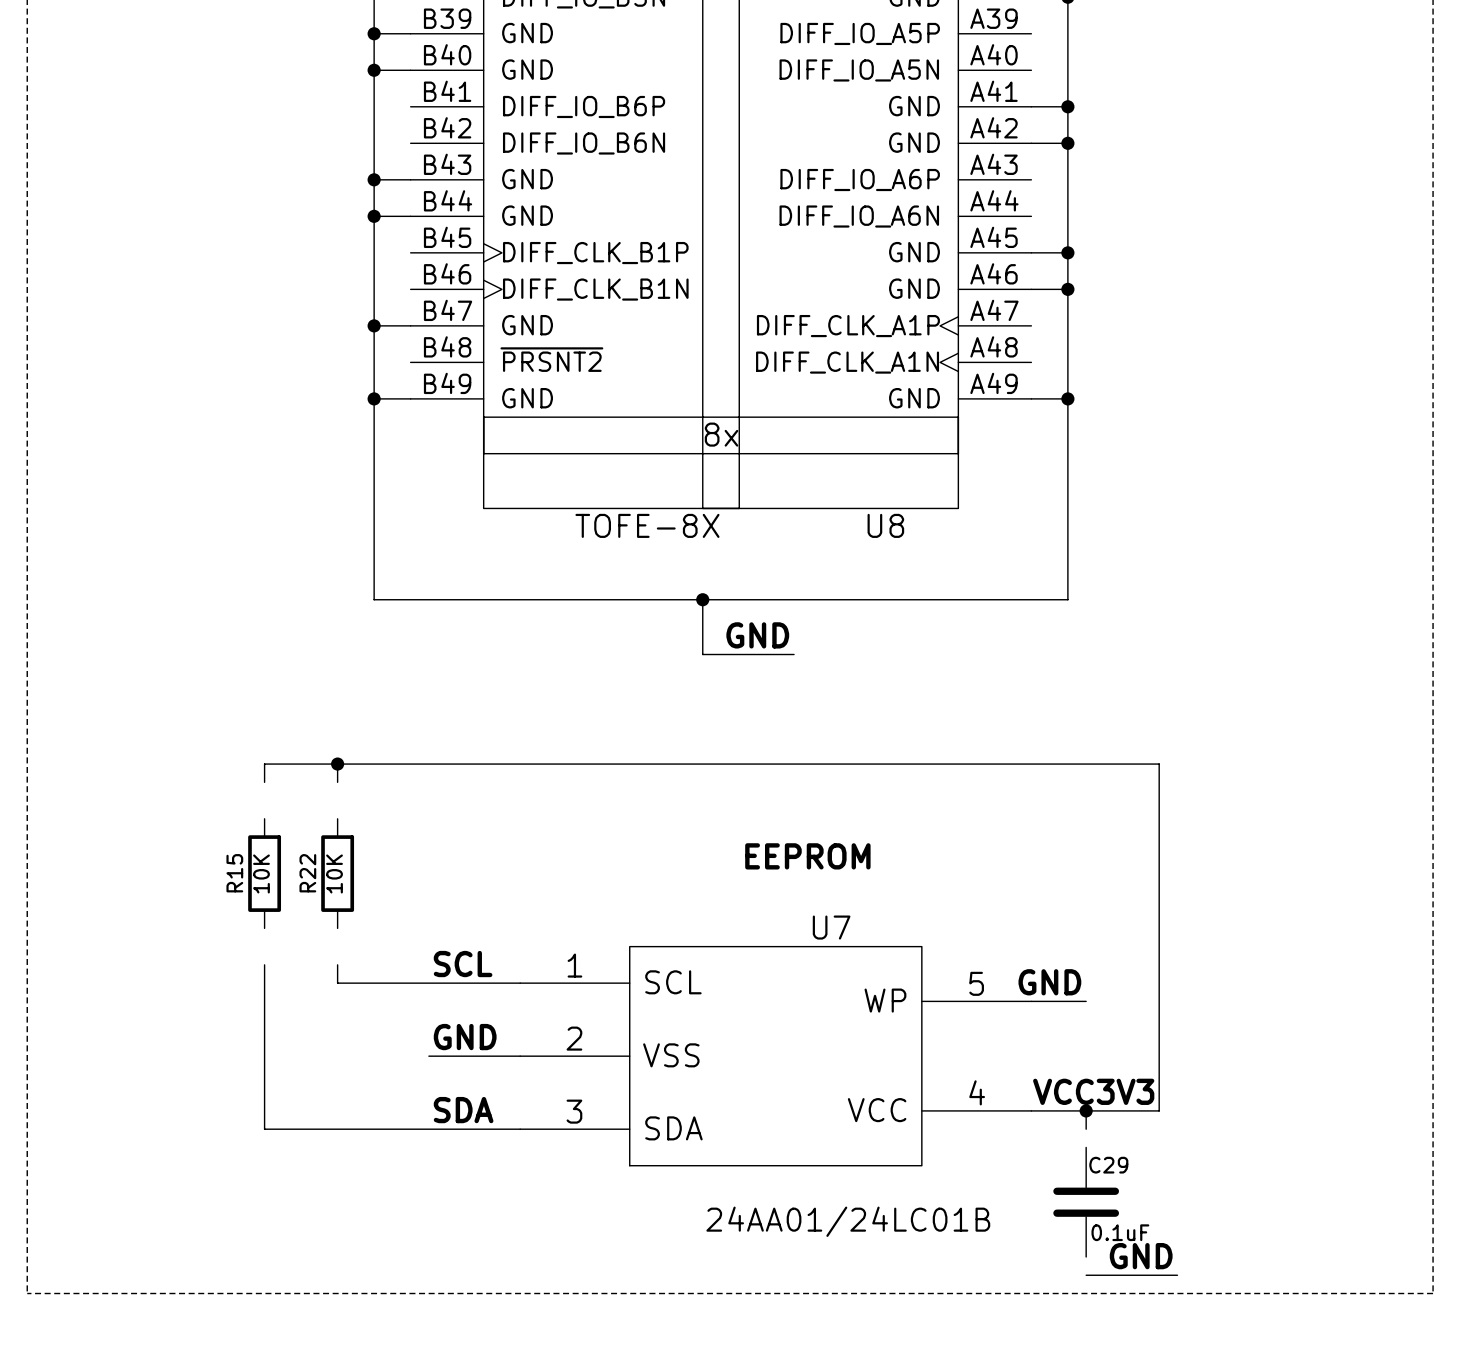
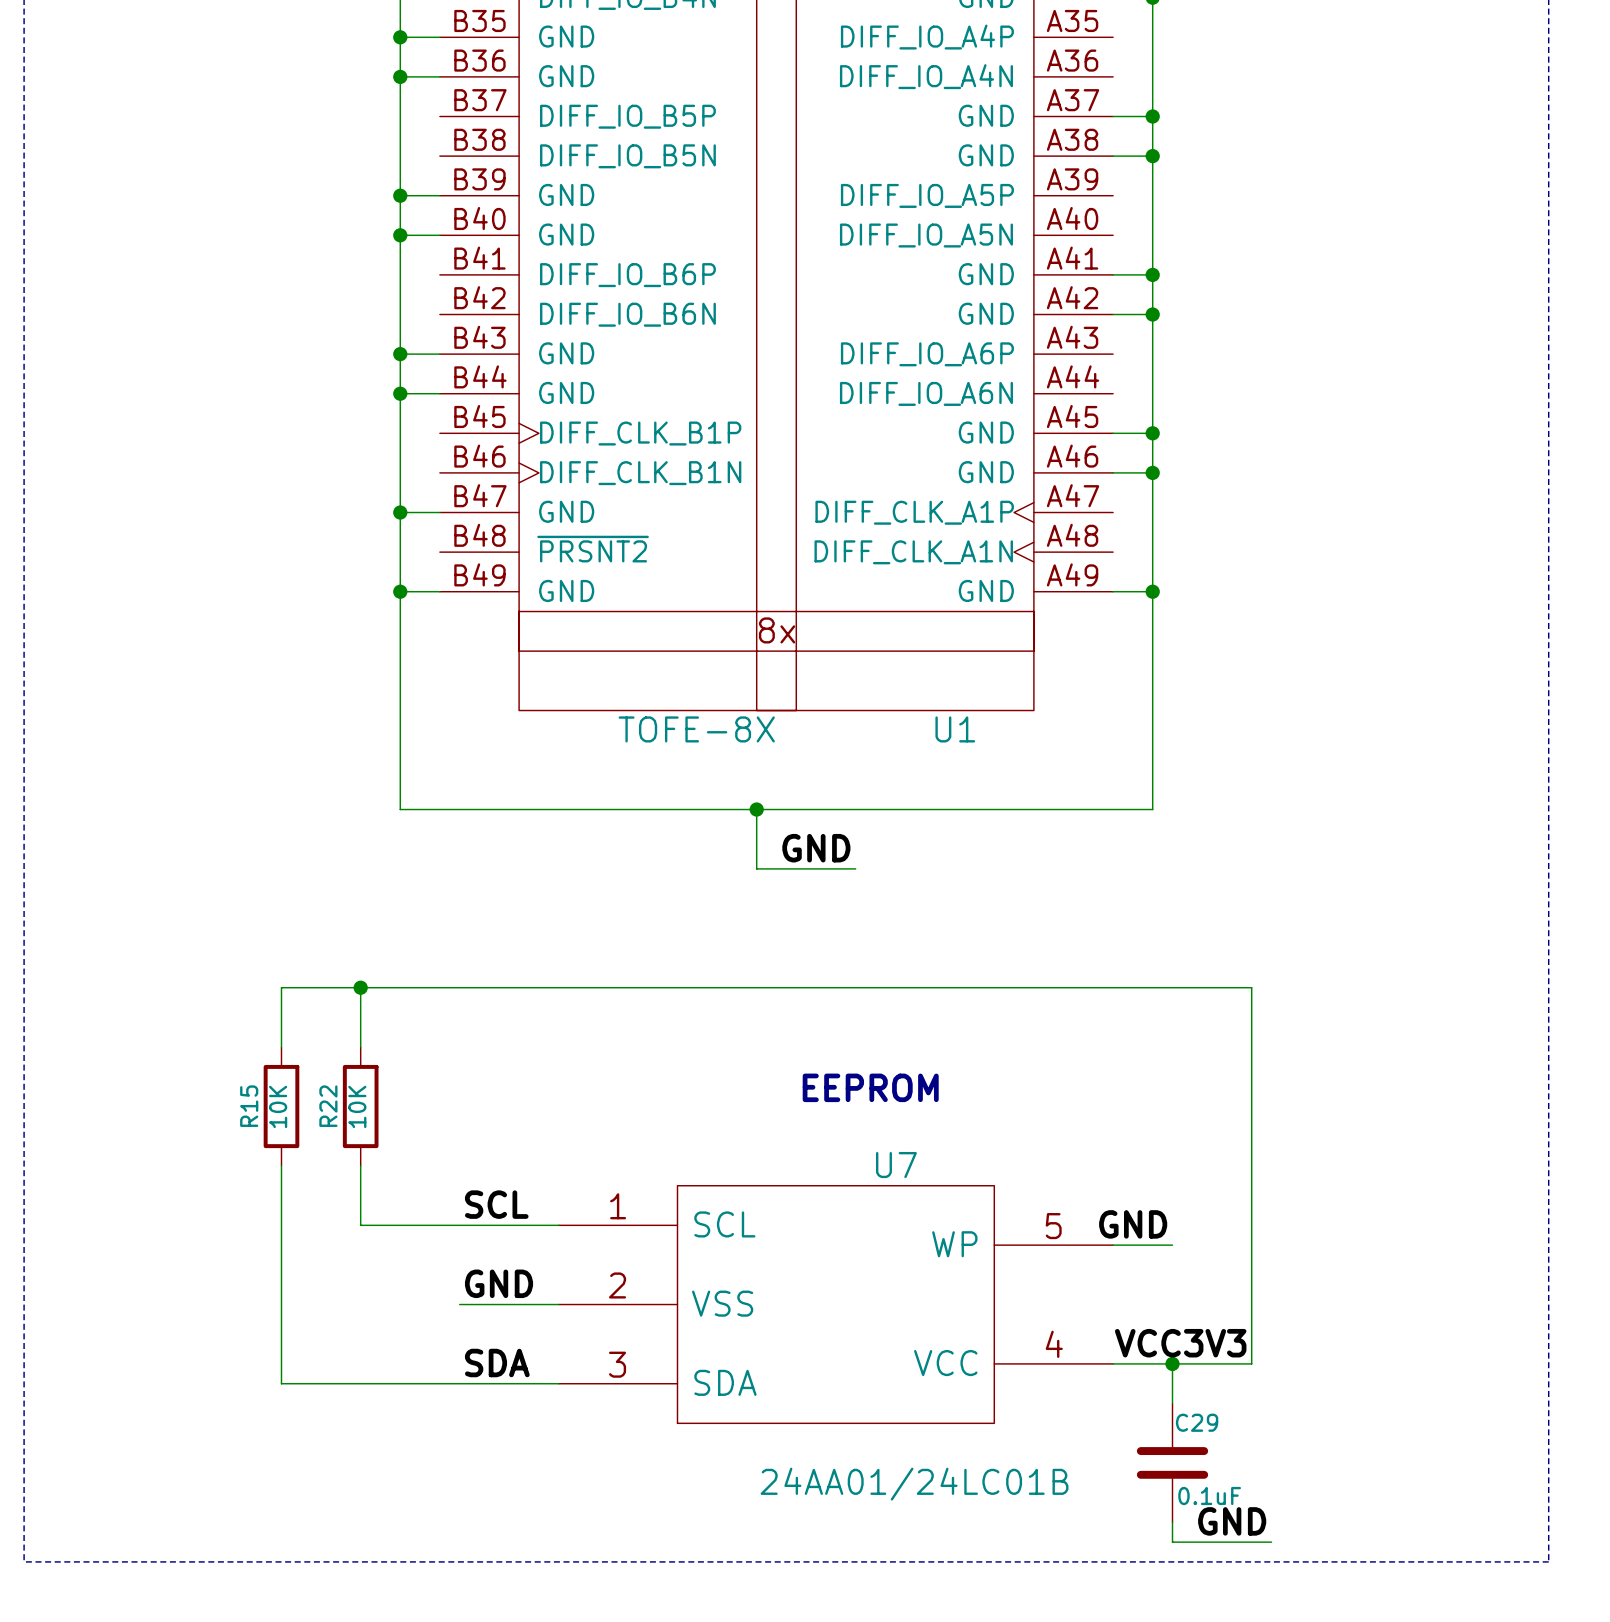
U8 name: U8 (885, 525) -> U1 (955, 729)
wire: none -> (281, 1007) (281, 1047)
wire: none -> (360, 1007) (360, 1047)
wire: none -> (281, 1165) (281, 1205)
wire: none -> (360, 1165) (360, 1205)
wire: none -> (1172, 1383) (1172, 1403)
wire: none -> (1172, 1522) (1172, 1542)

